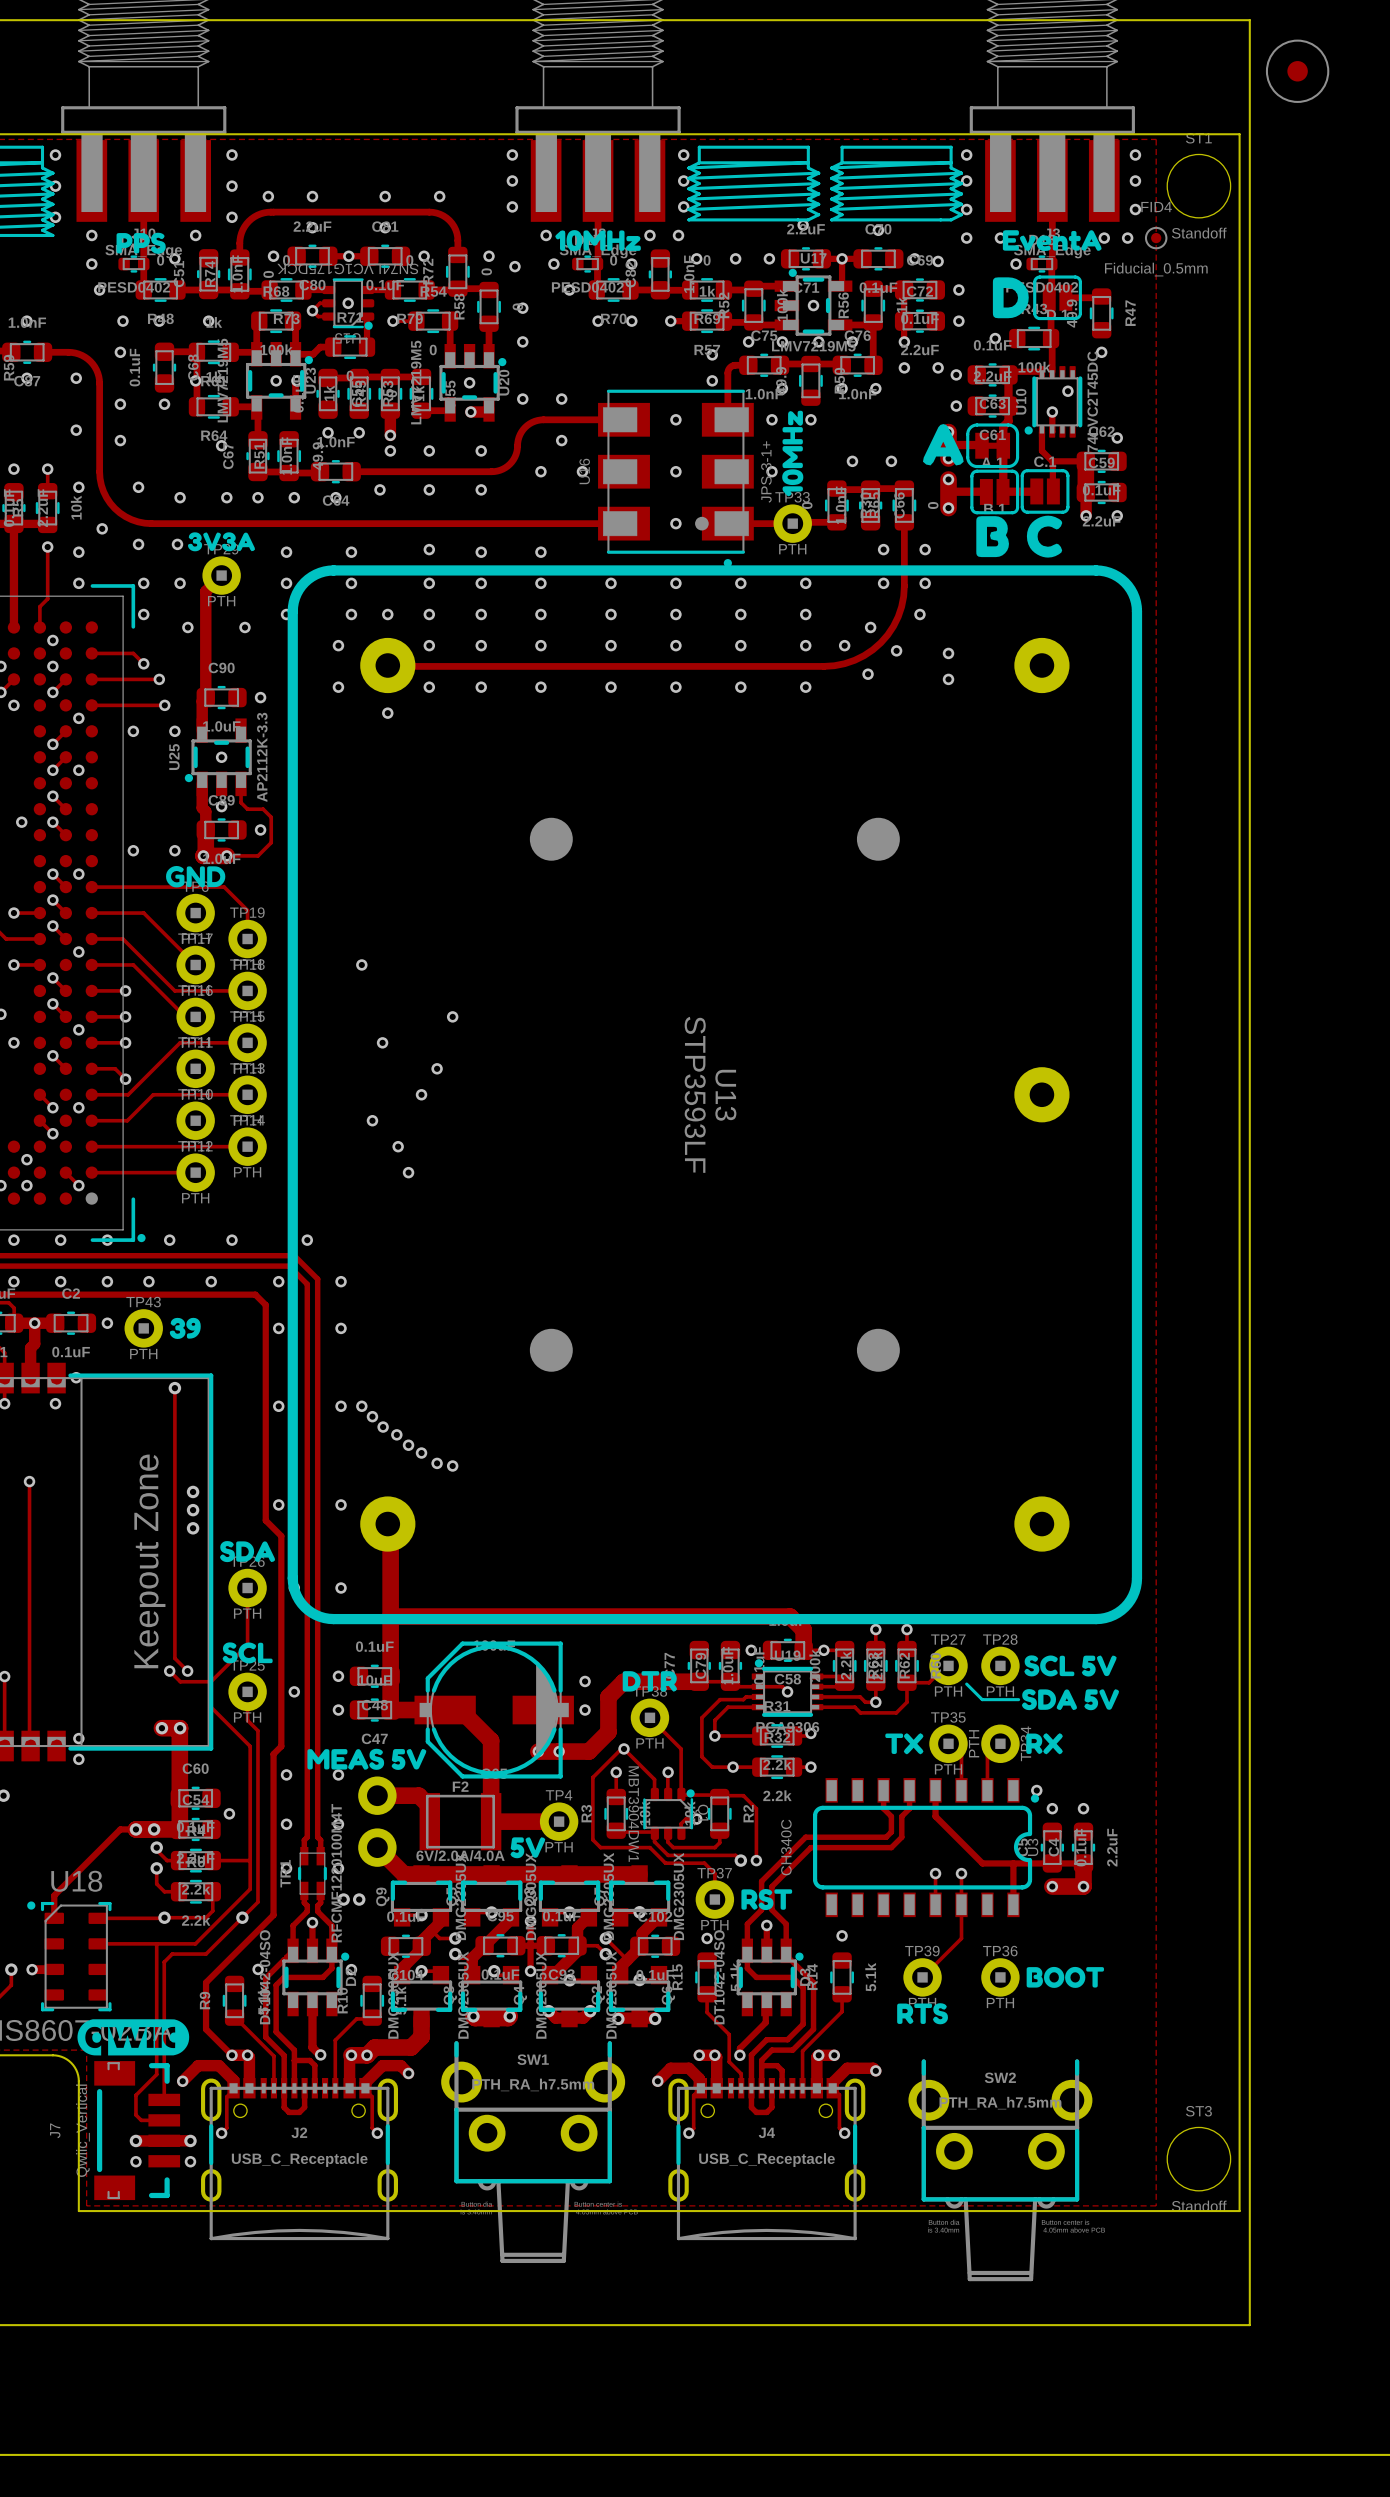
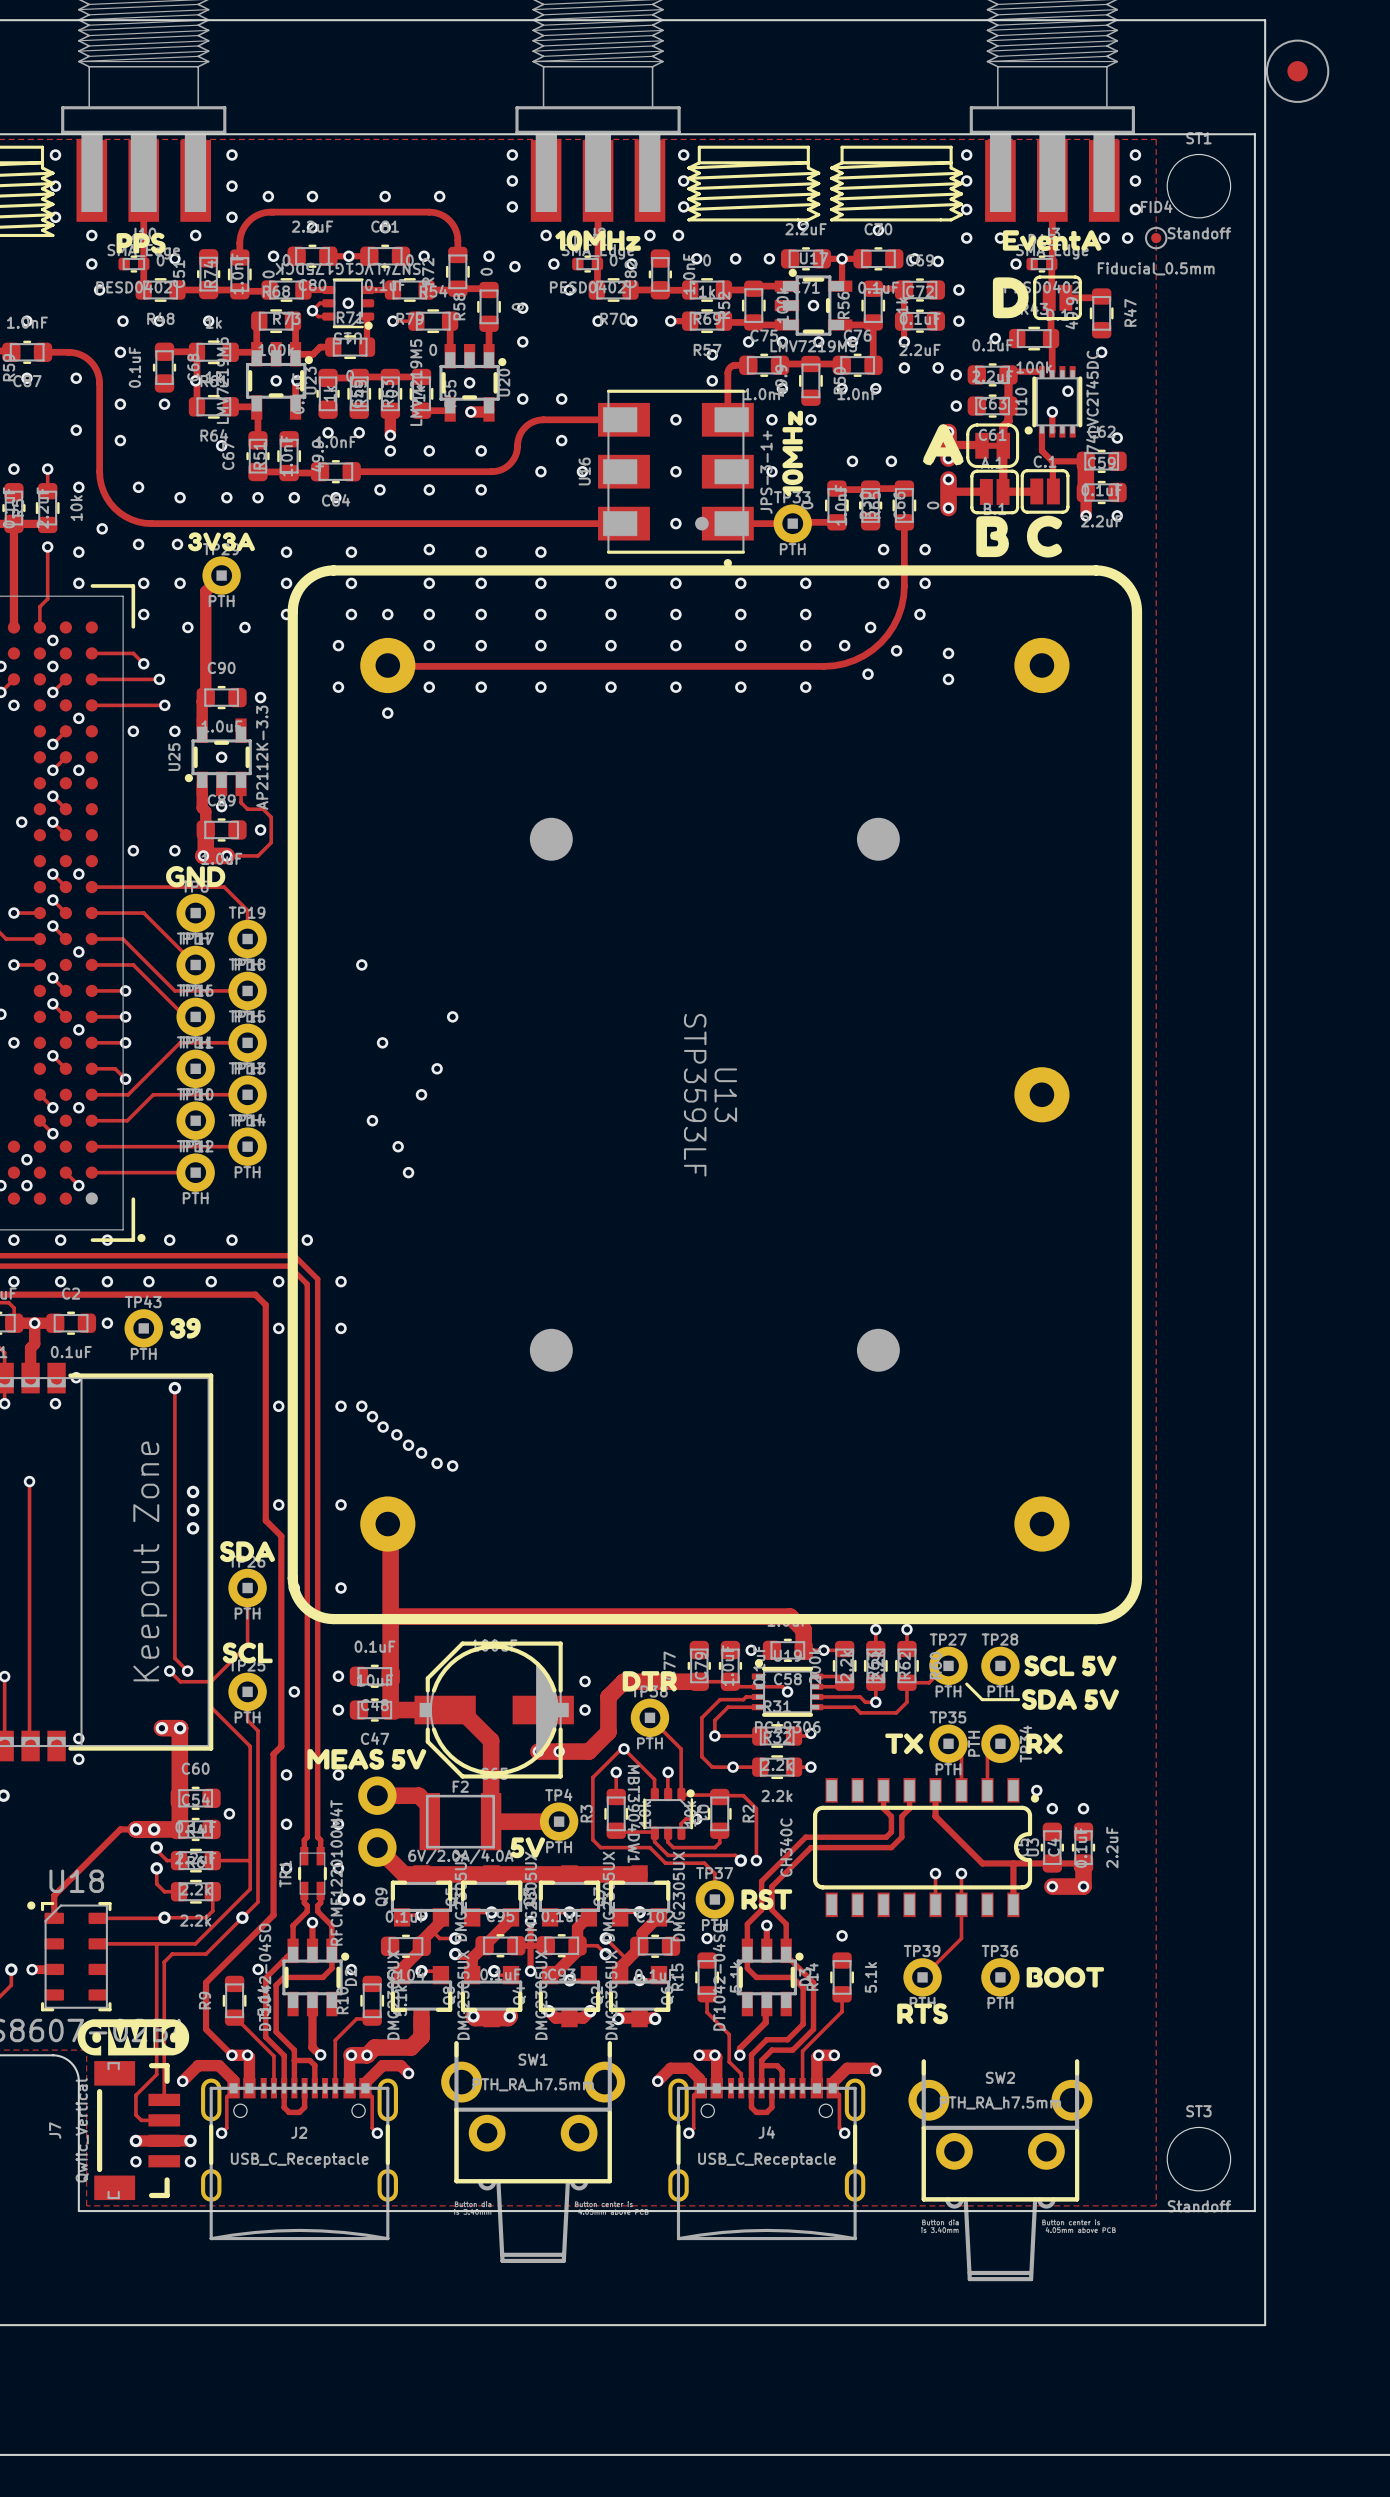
board edge: (1249, 20) (1249, 2325) -> (1249, 20) (1265, 20) (1265, 2325) (1249, 2325)
board edge: (1239, 134) (1239, 2211) -> (1239, 134) (1254, 134) (1254, 2211) (1239, 2211)

